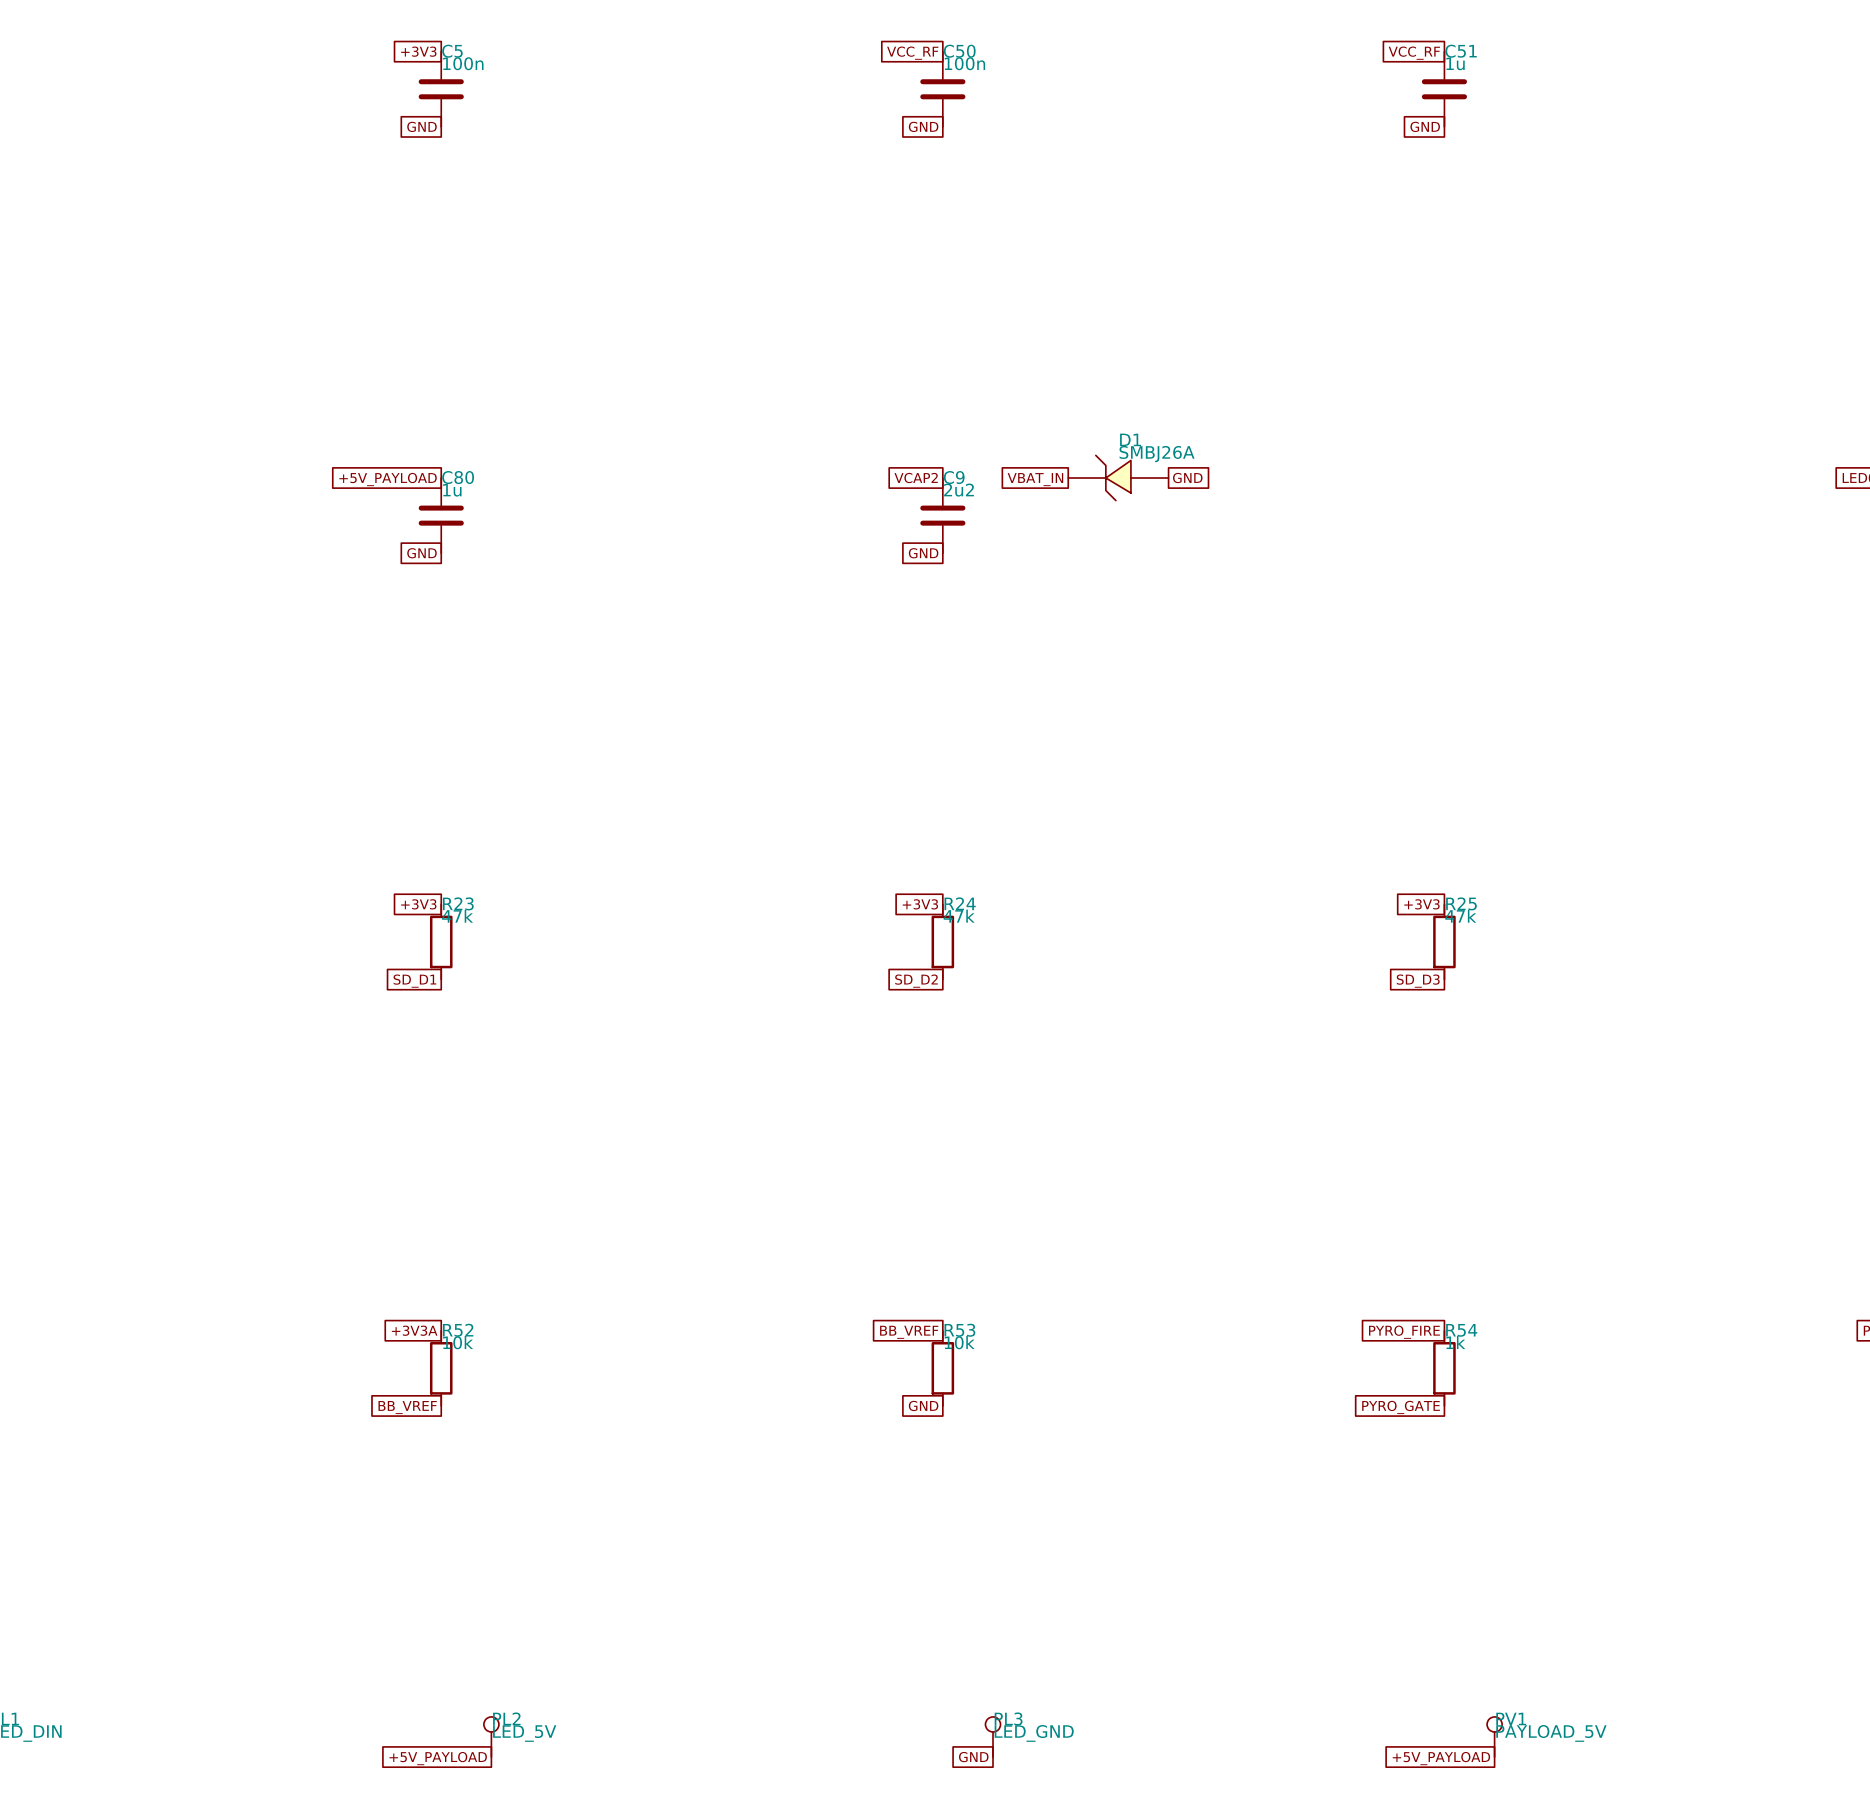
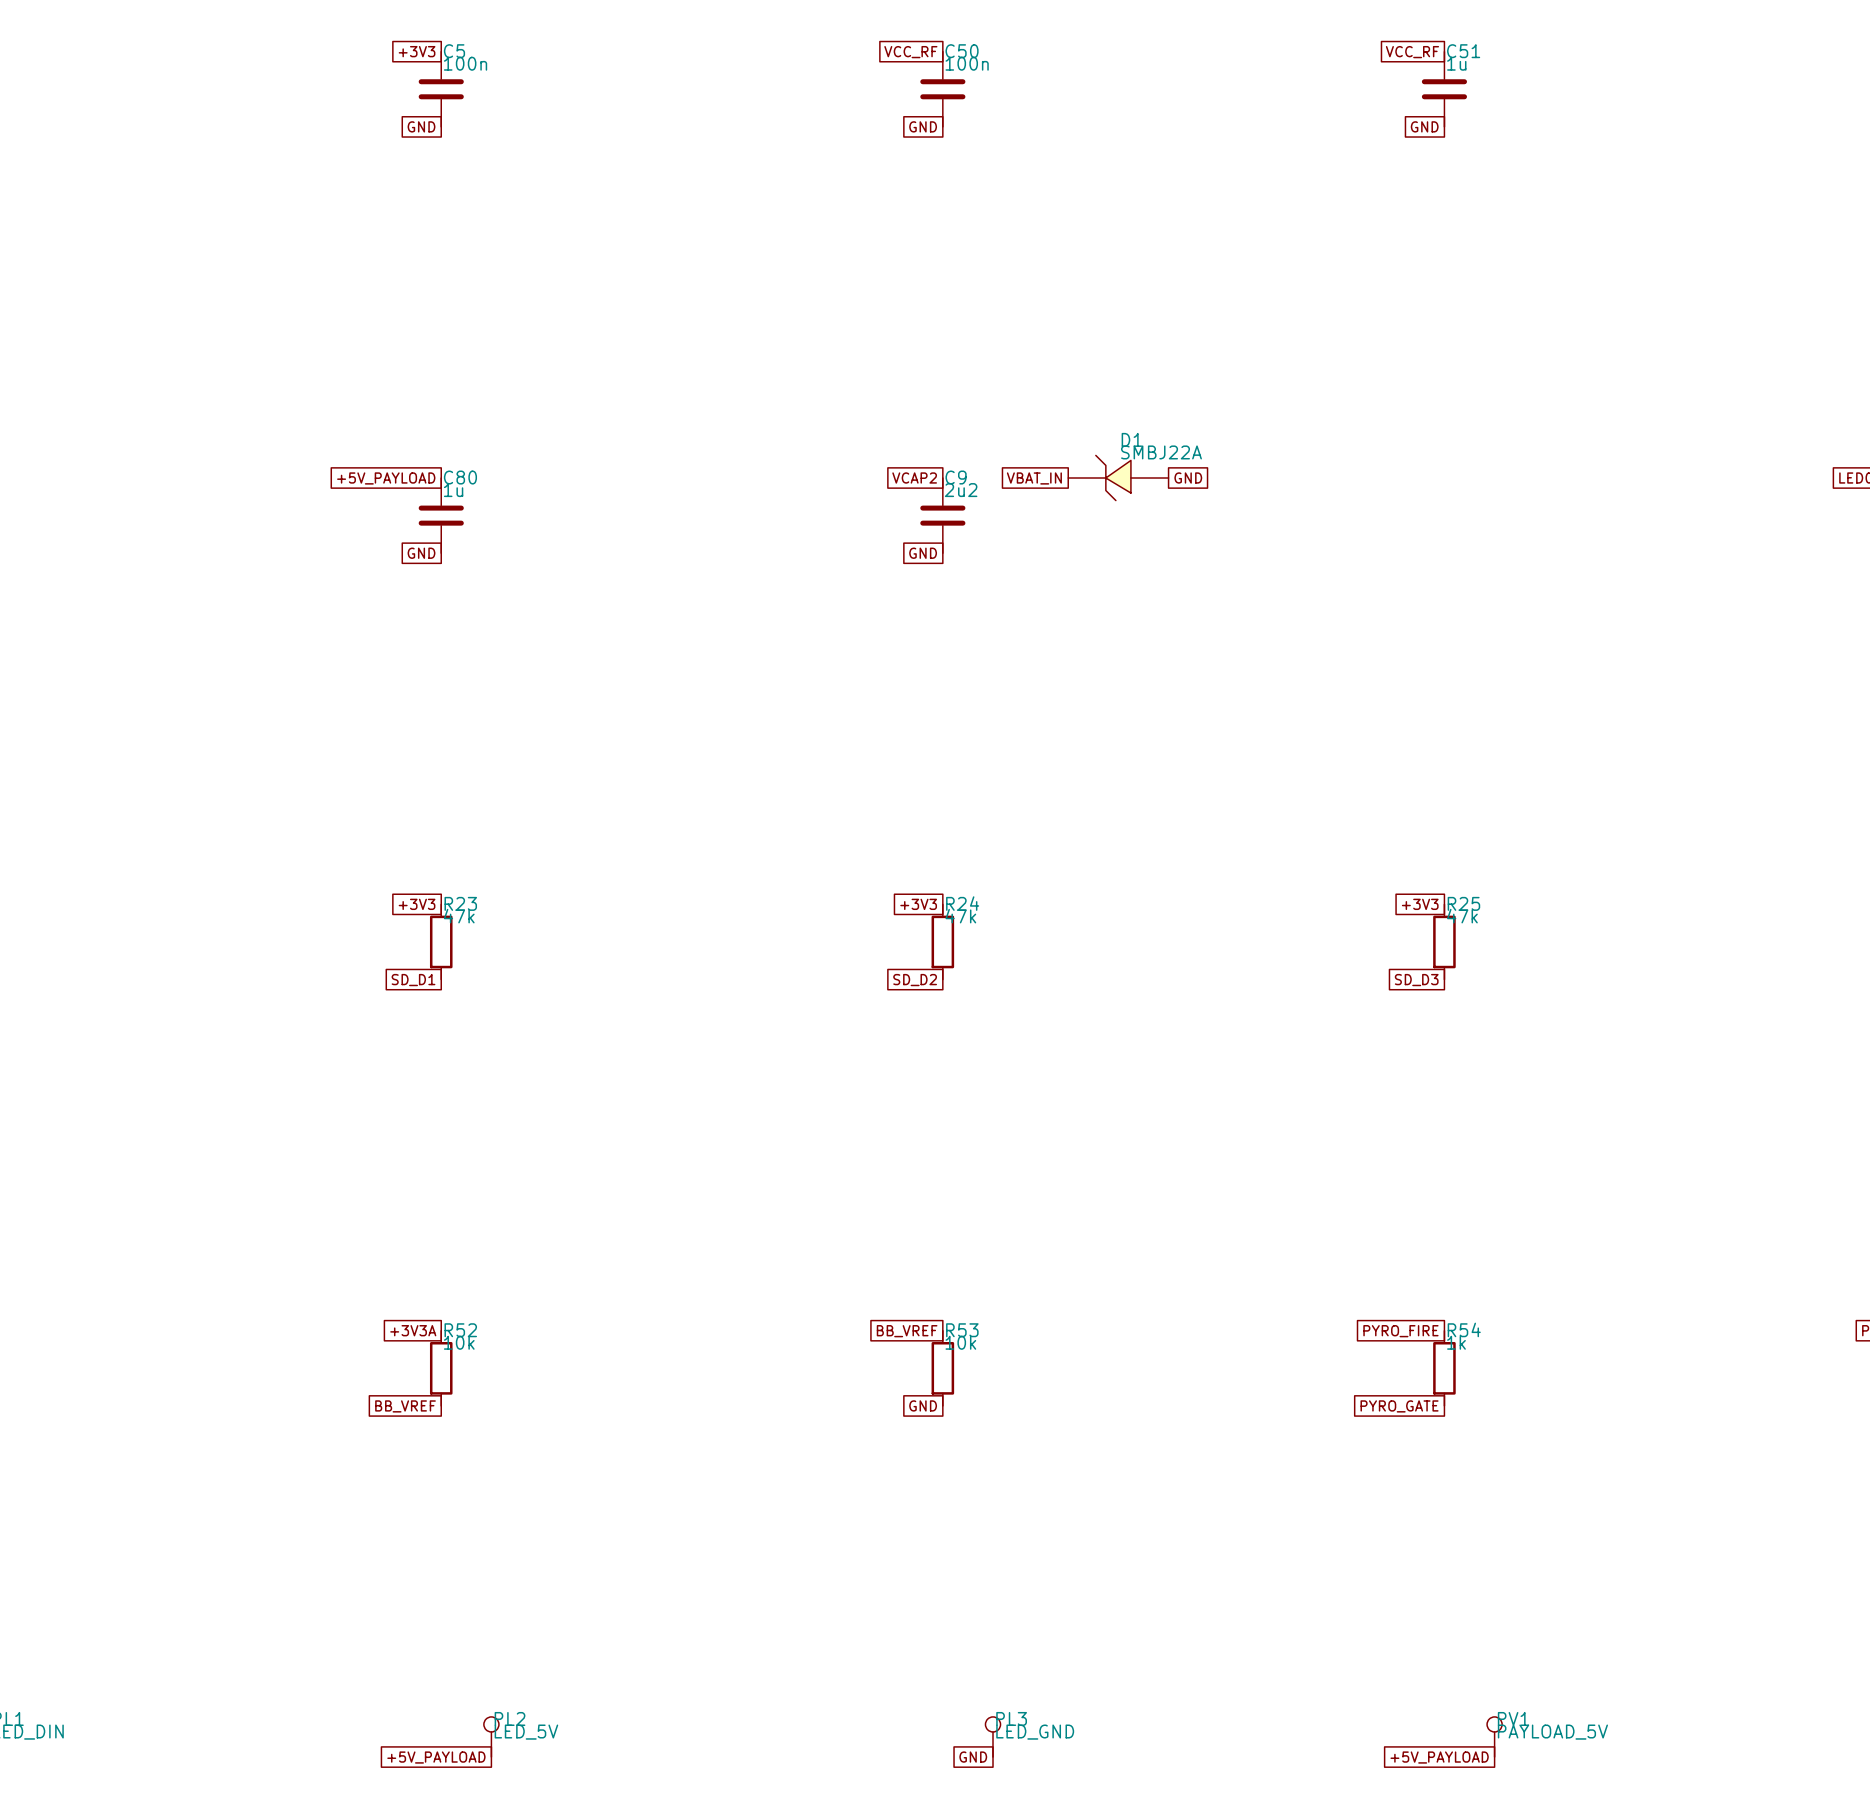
D1 value: SMBJ26A (1157, 454) -> SMBJ22A (1161, 452)

